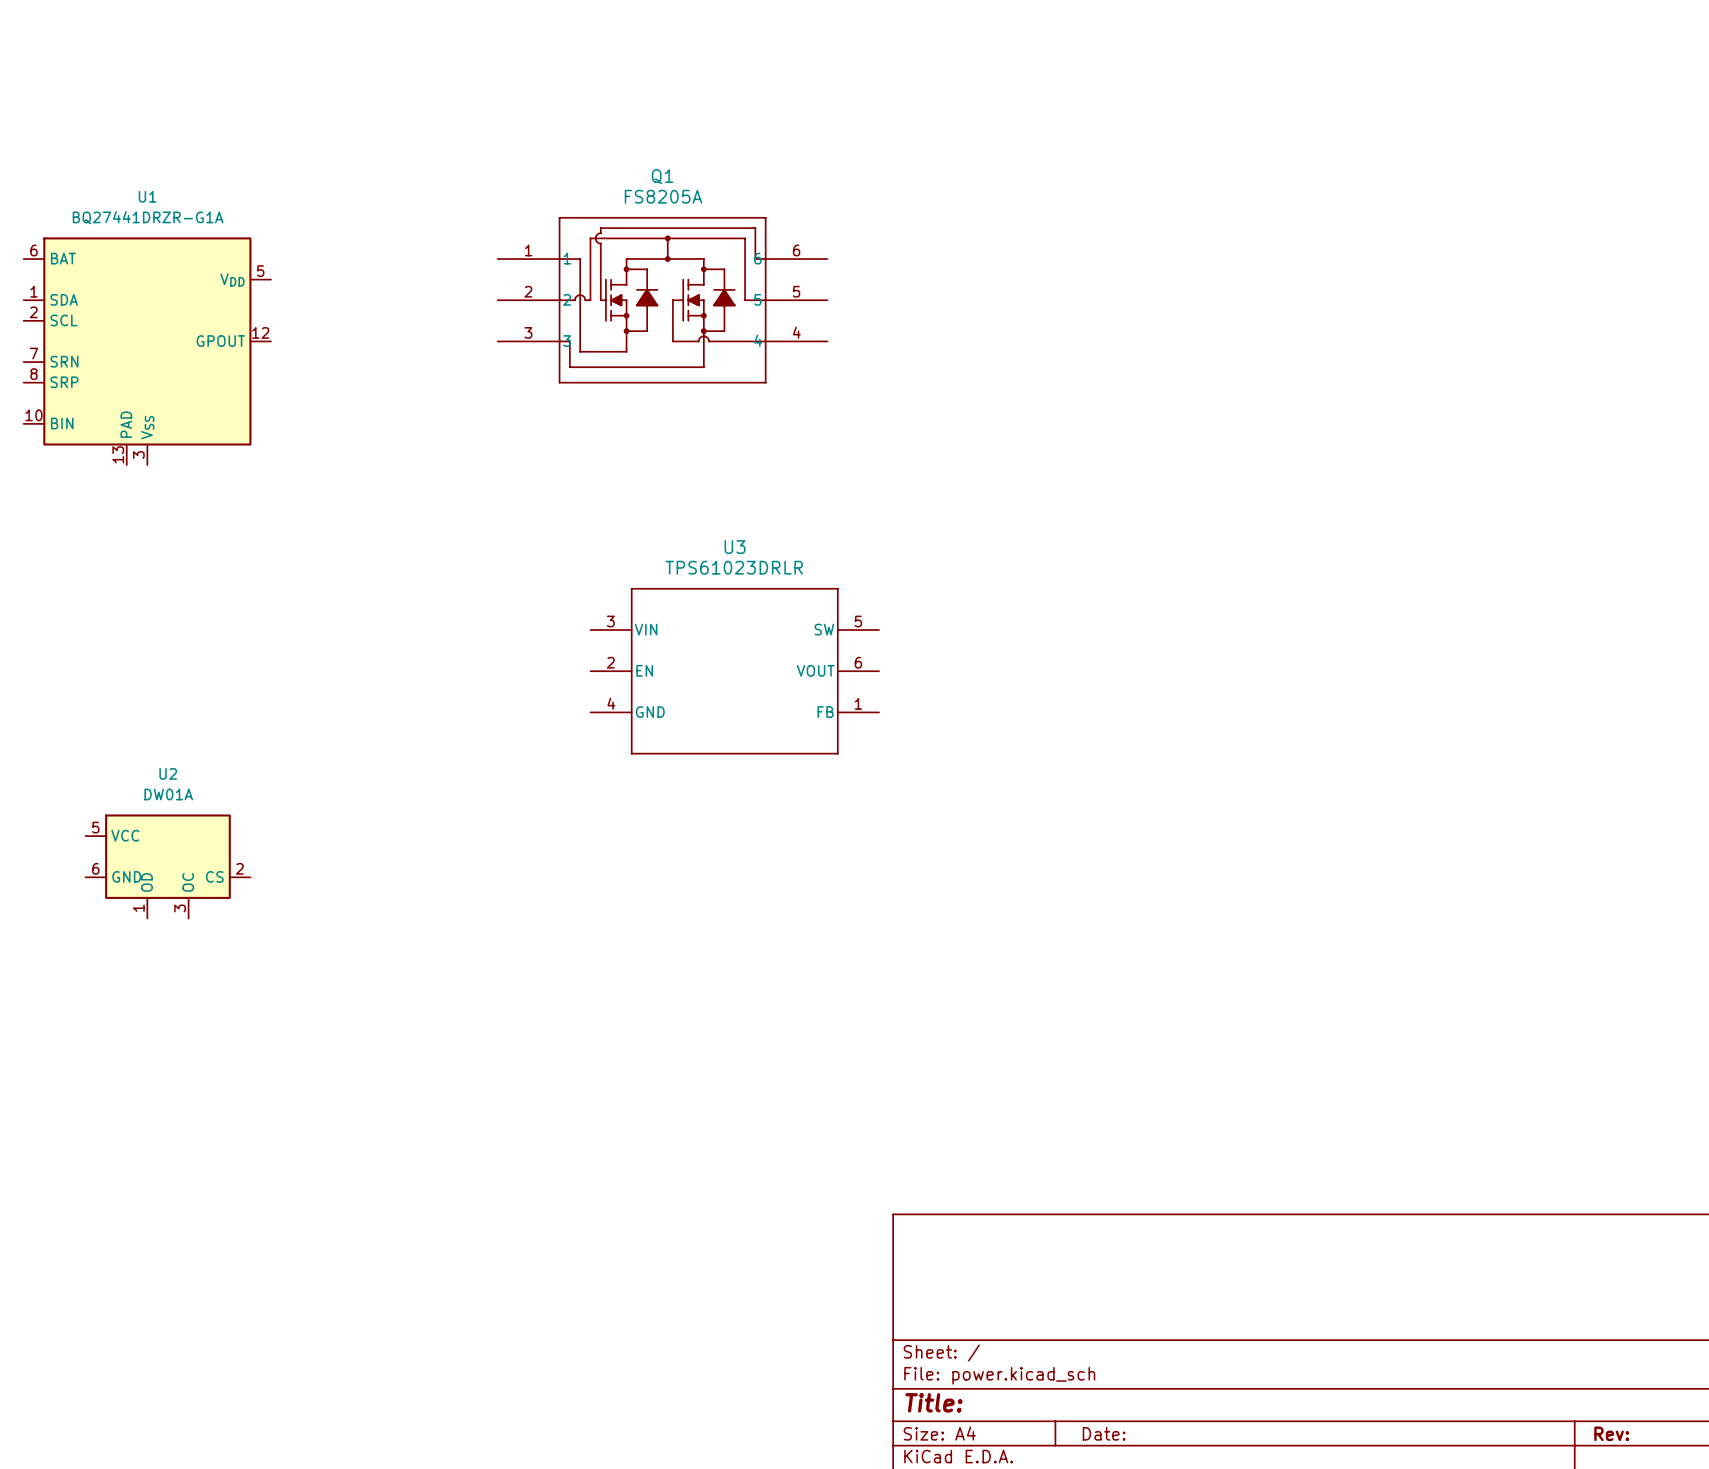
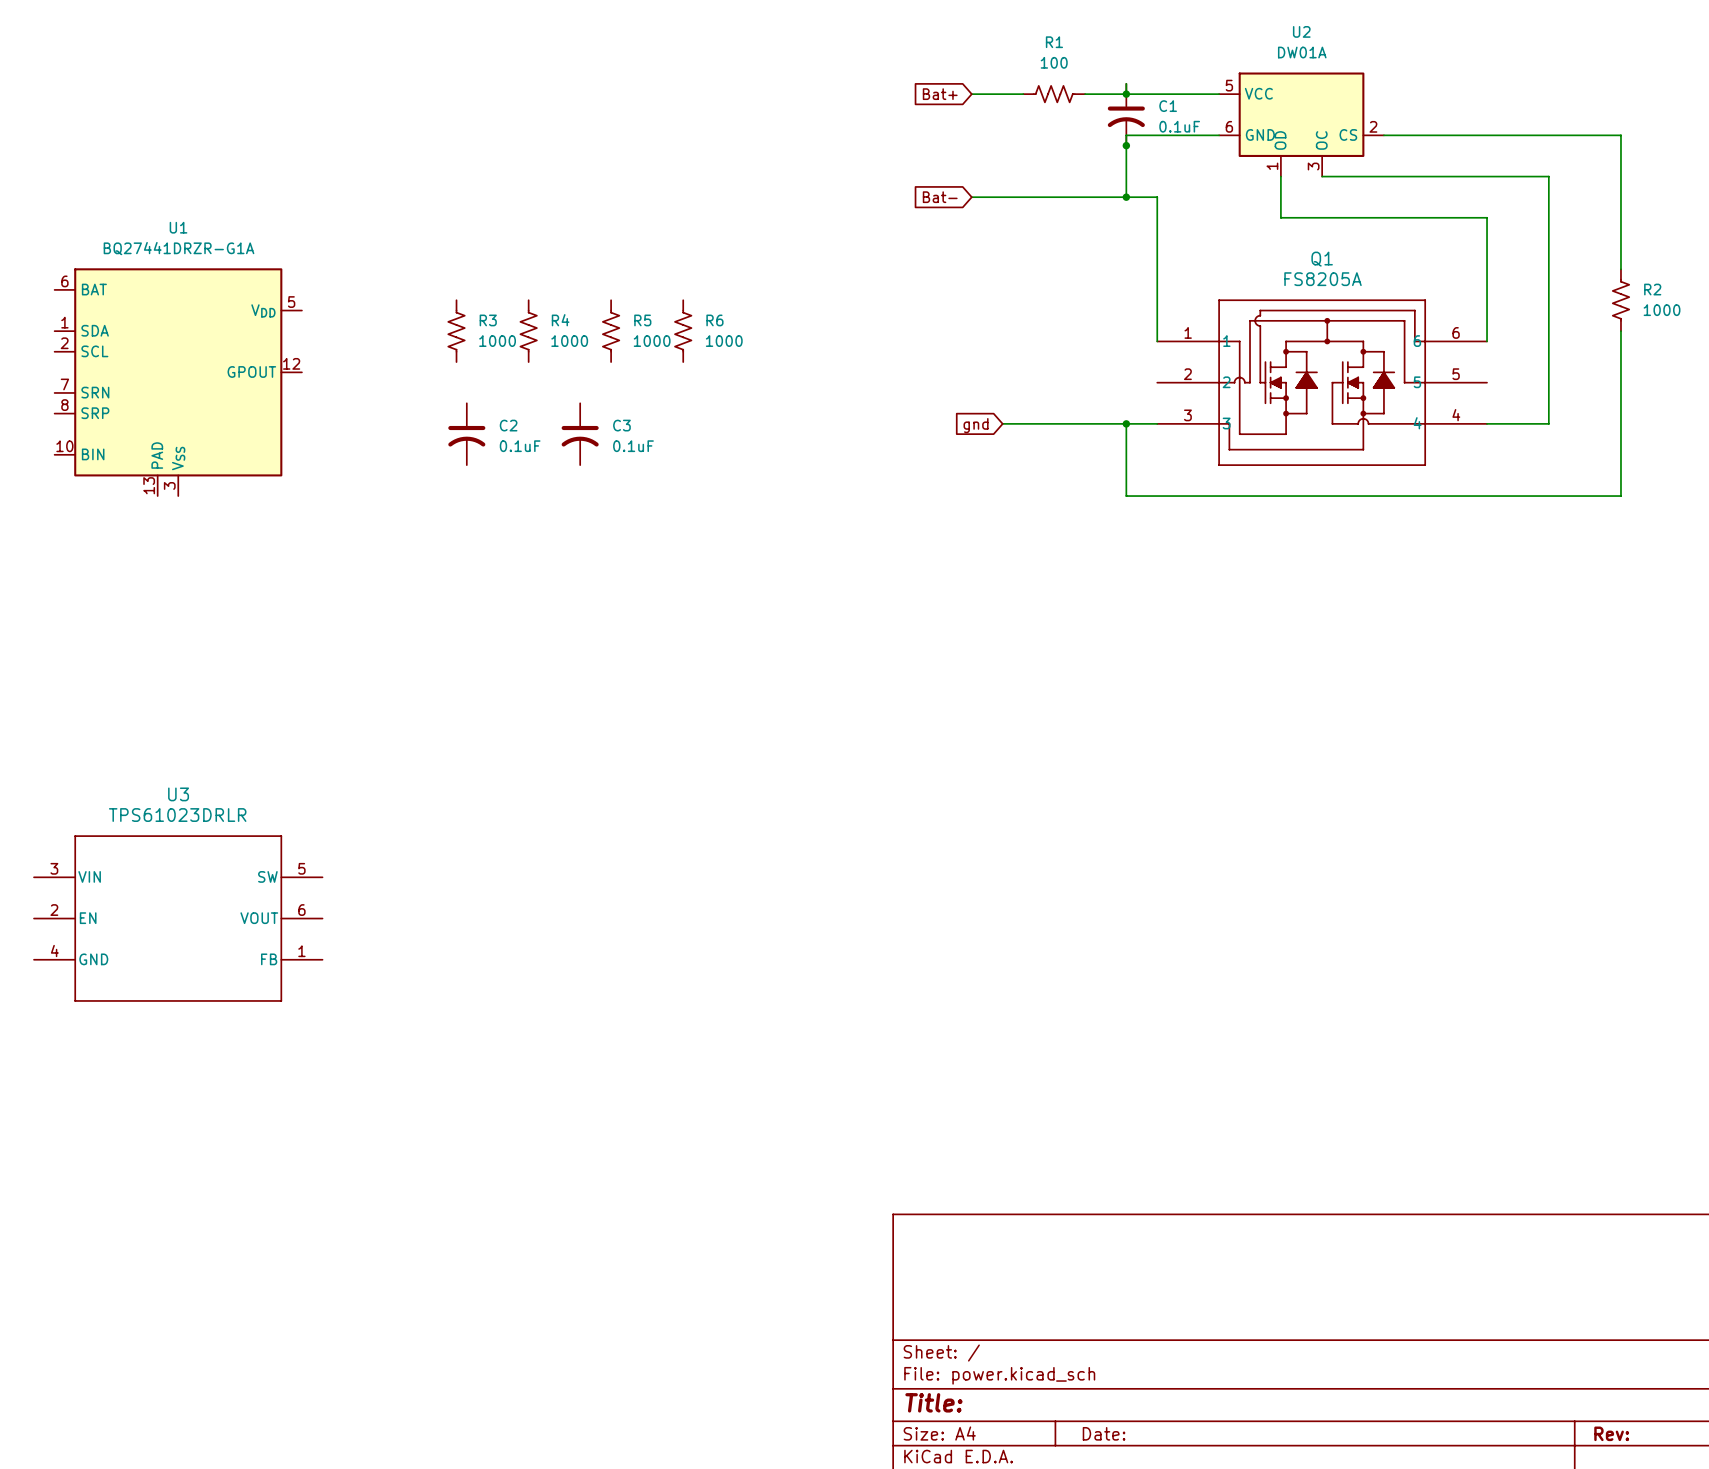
wire: none -> (1126, 83) (1126, 94)
global label: none -> Bat+ (940, 94)
wire: none -> (971, 94) (1023, 94)
R1: none -> 100 (1054, 94)
wire: none -> (1085, 94) (1219, 94)
junction: none -> (1126, 94)
C1: none -> 0.1uF (1126, 114)
wire: none -> (1219, 135) (1126, 135) (1126, 197)
wire: none -> (1383, 135) (1620, 135) (1620, 269)
junction: none -> (1126, 145)
wire: none -> (1280, 176) (1280, 217) (1487, 217) (1487, 341)
wire: none -> (1322, 176) (1548, 176) (1548, 423) (1487, 423)
global label: none -> Bat- (940, 197)
wire: none -> (971, 197) (1157, 197) (1157, 341)
junction: none -> (1126, 197)
Q1 position: (662, 300) -> (1322, 382)
R2: none -> 1000 (1620, 300)
R3: none -> 1000 (456, 331)
R4: none -> 1000 (528, 331)
R5: none -> 1000 (611, 331)
R6: none -> 1000 (683, 331)
wire: none -> (1620, 331) (1620, 496) (1126, 496) (1126, 423)
U1 position: (147, 351) -> (178, 382)
wire: none -> (1002, 423) (1157, 423)
junction: none -> (1126, 423)
global label: none -> gnd (976, 425)
C2: none -> 0.1uF (466, 434)
C3: none -> 0.1uF (580, 434)
U3 position: (734, 671) -> (178, 918)
U2 position: (167, 866) -> (1301, 124)

